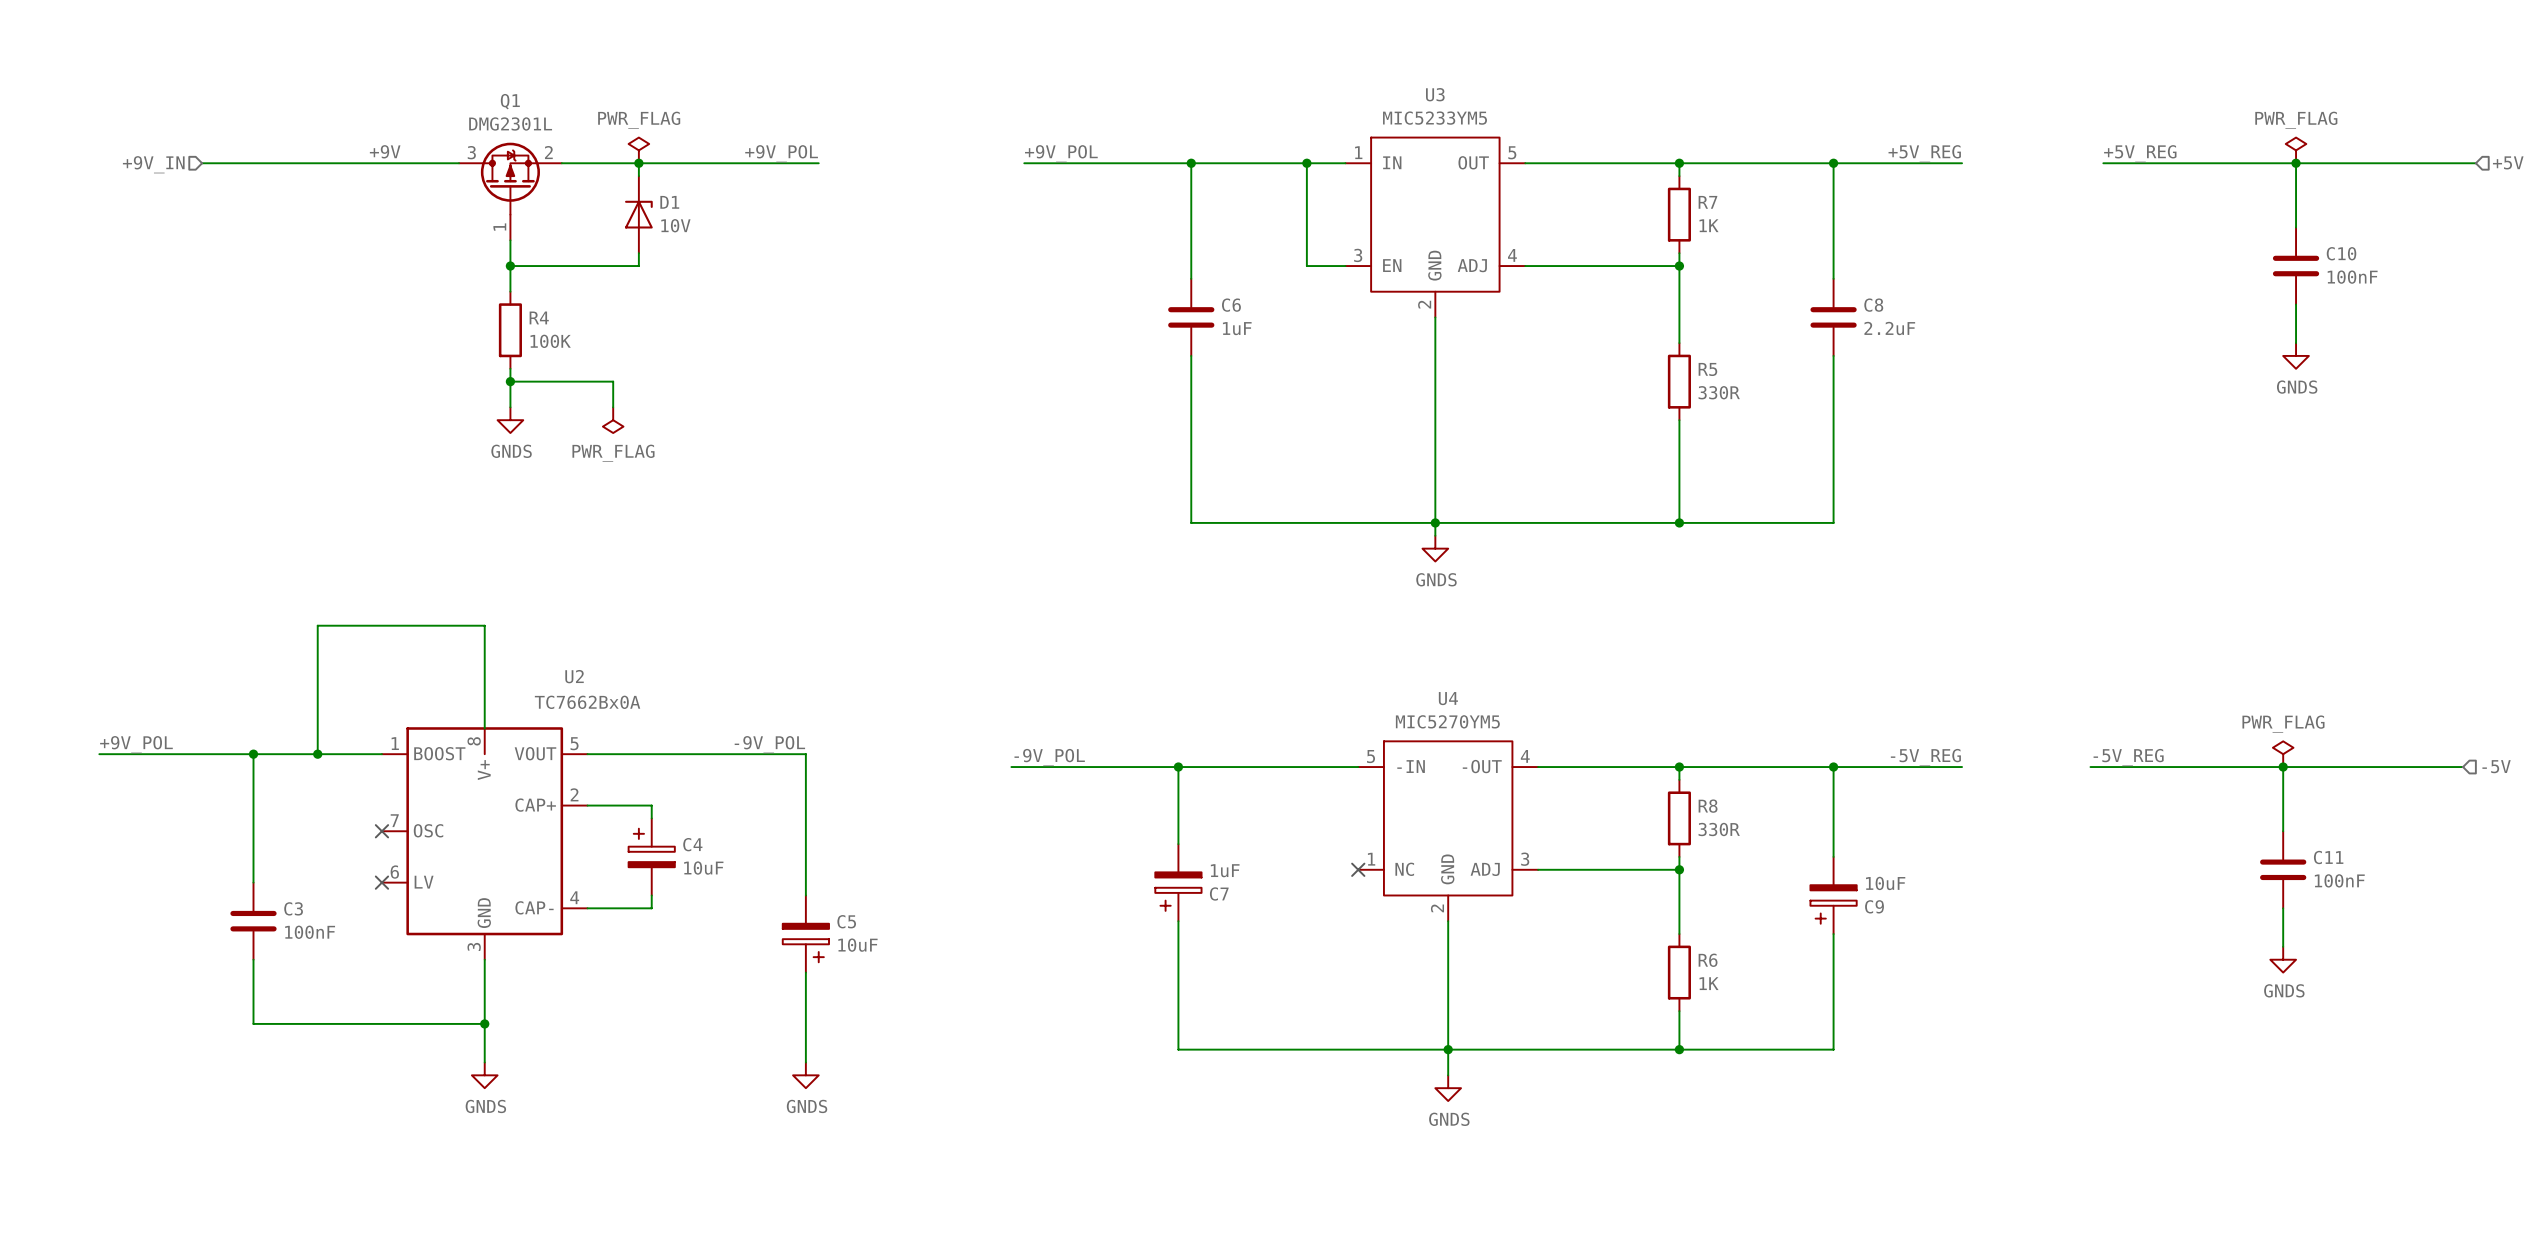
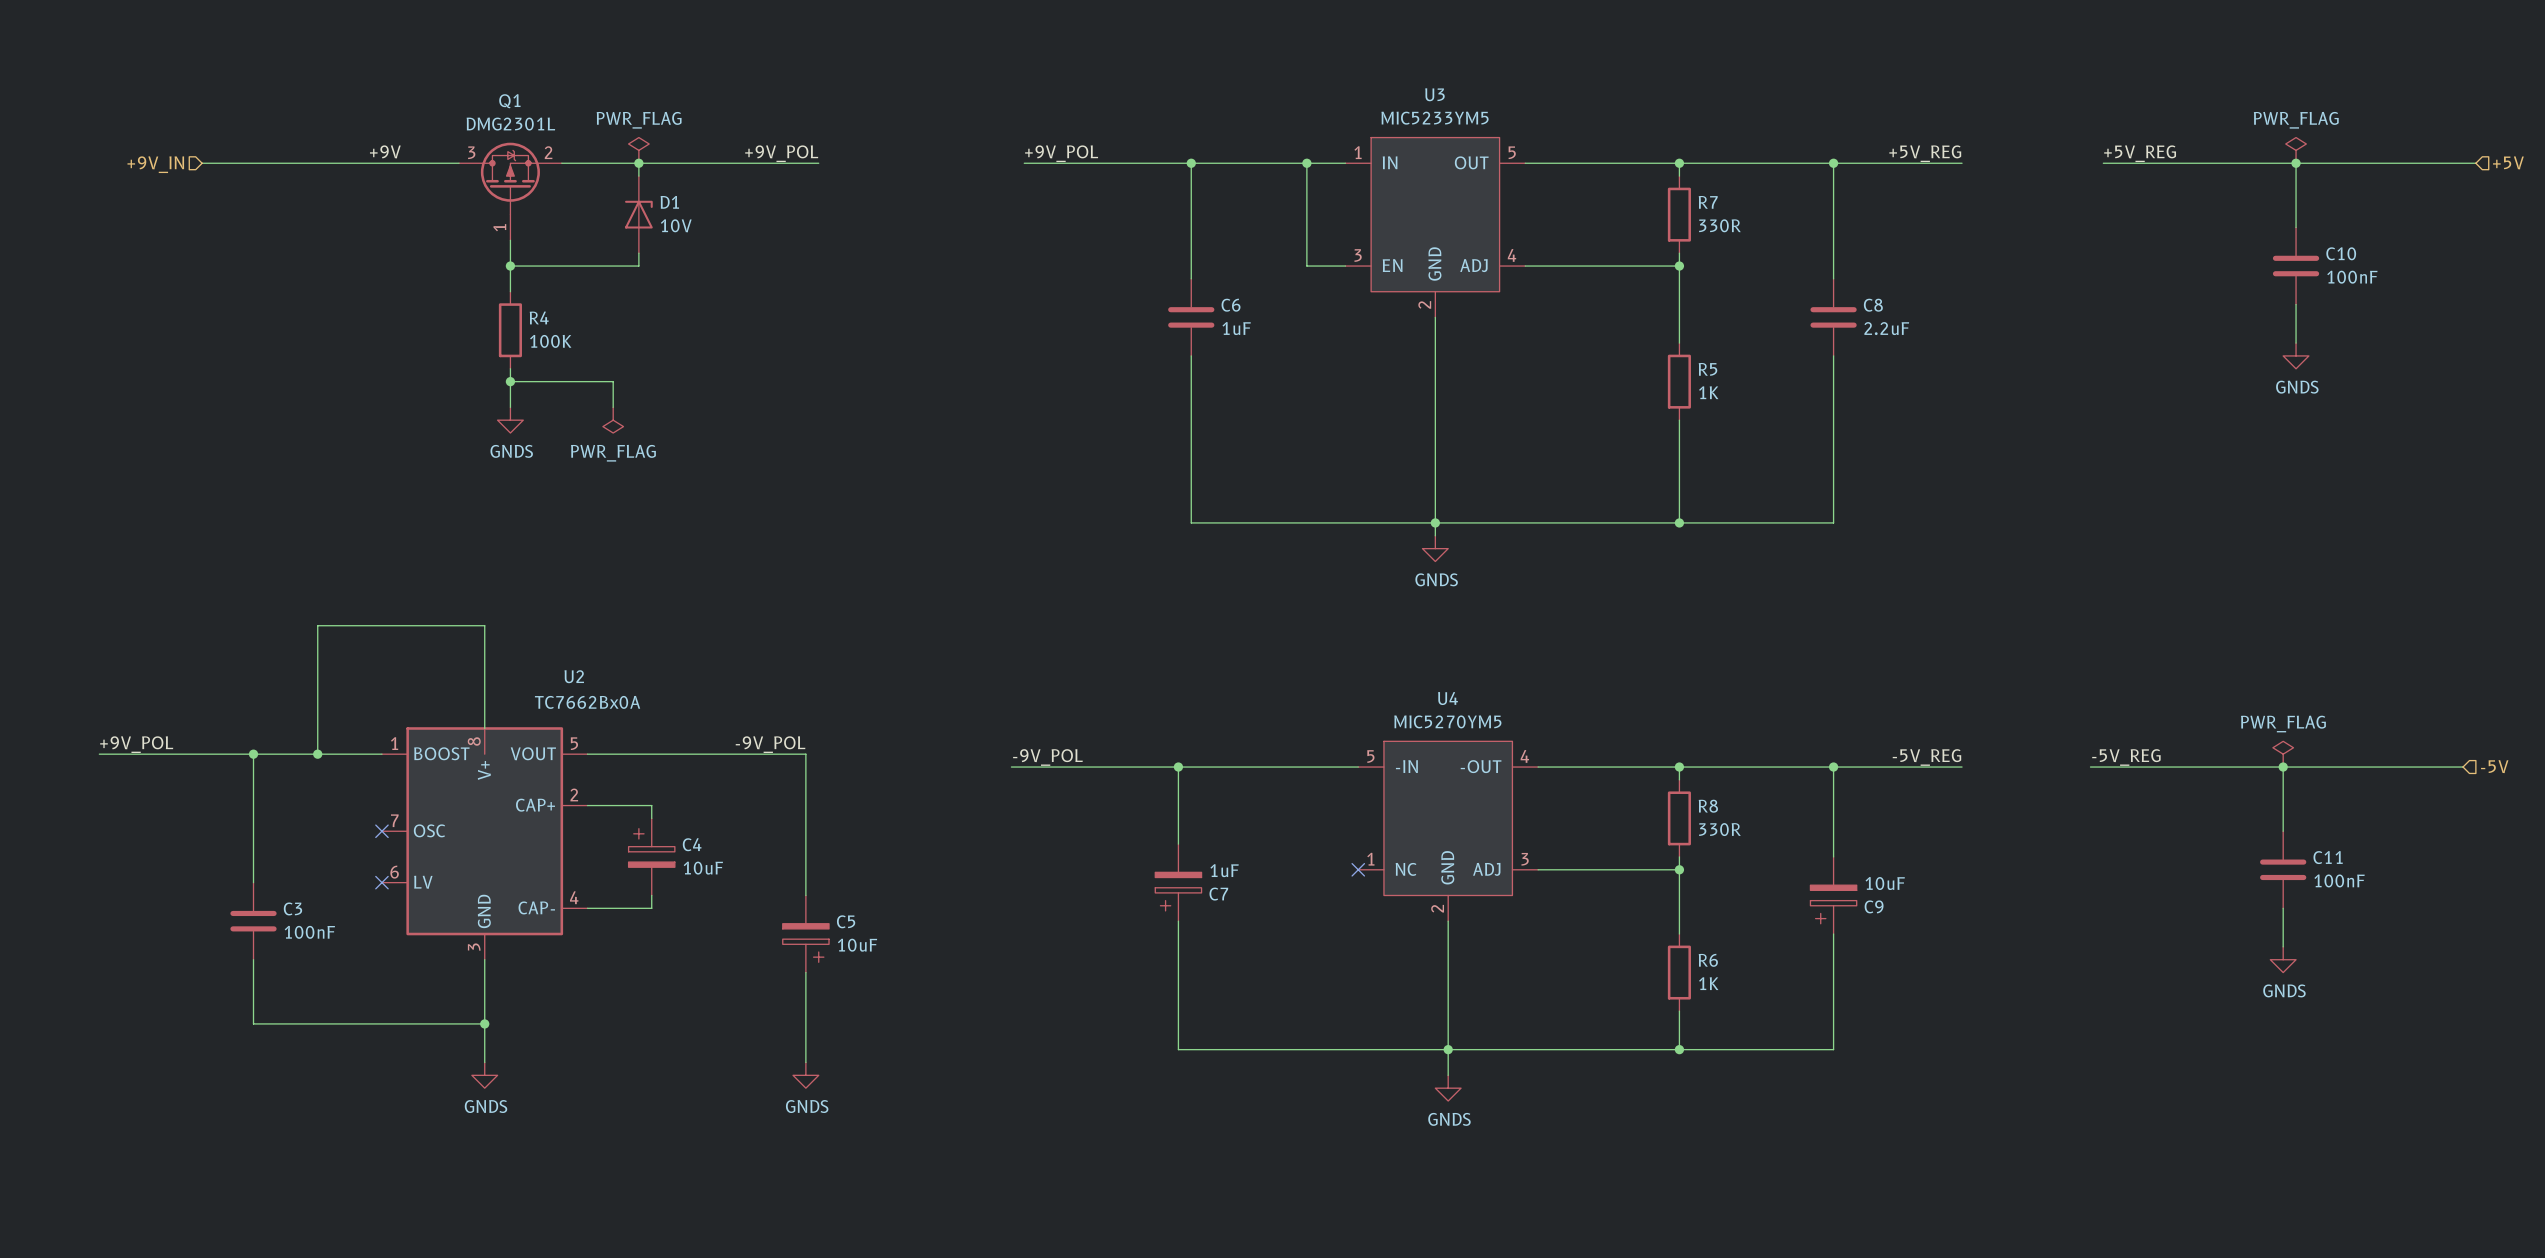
R7 value: 1K (1709, 225) -> 330R (1719, 225)
R5 value: 330R (1719, 392) -> 1K (1708, 392)

